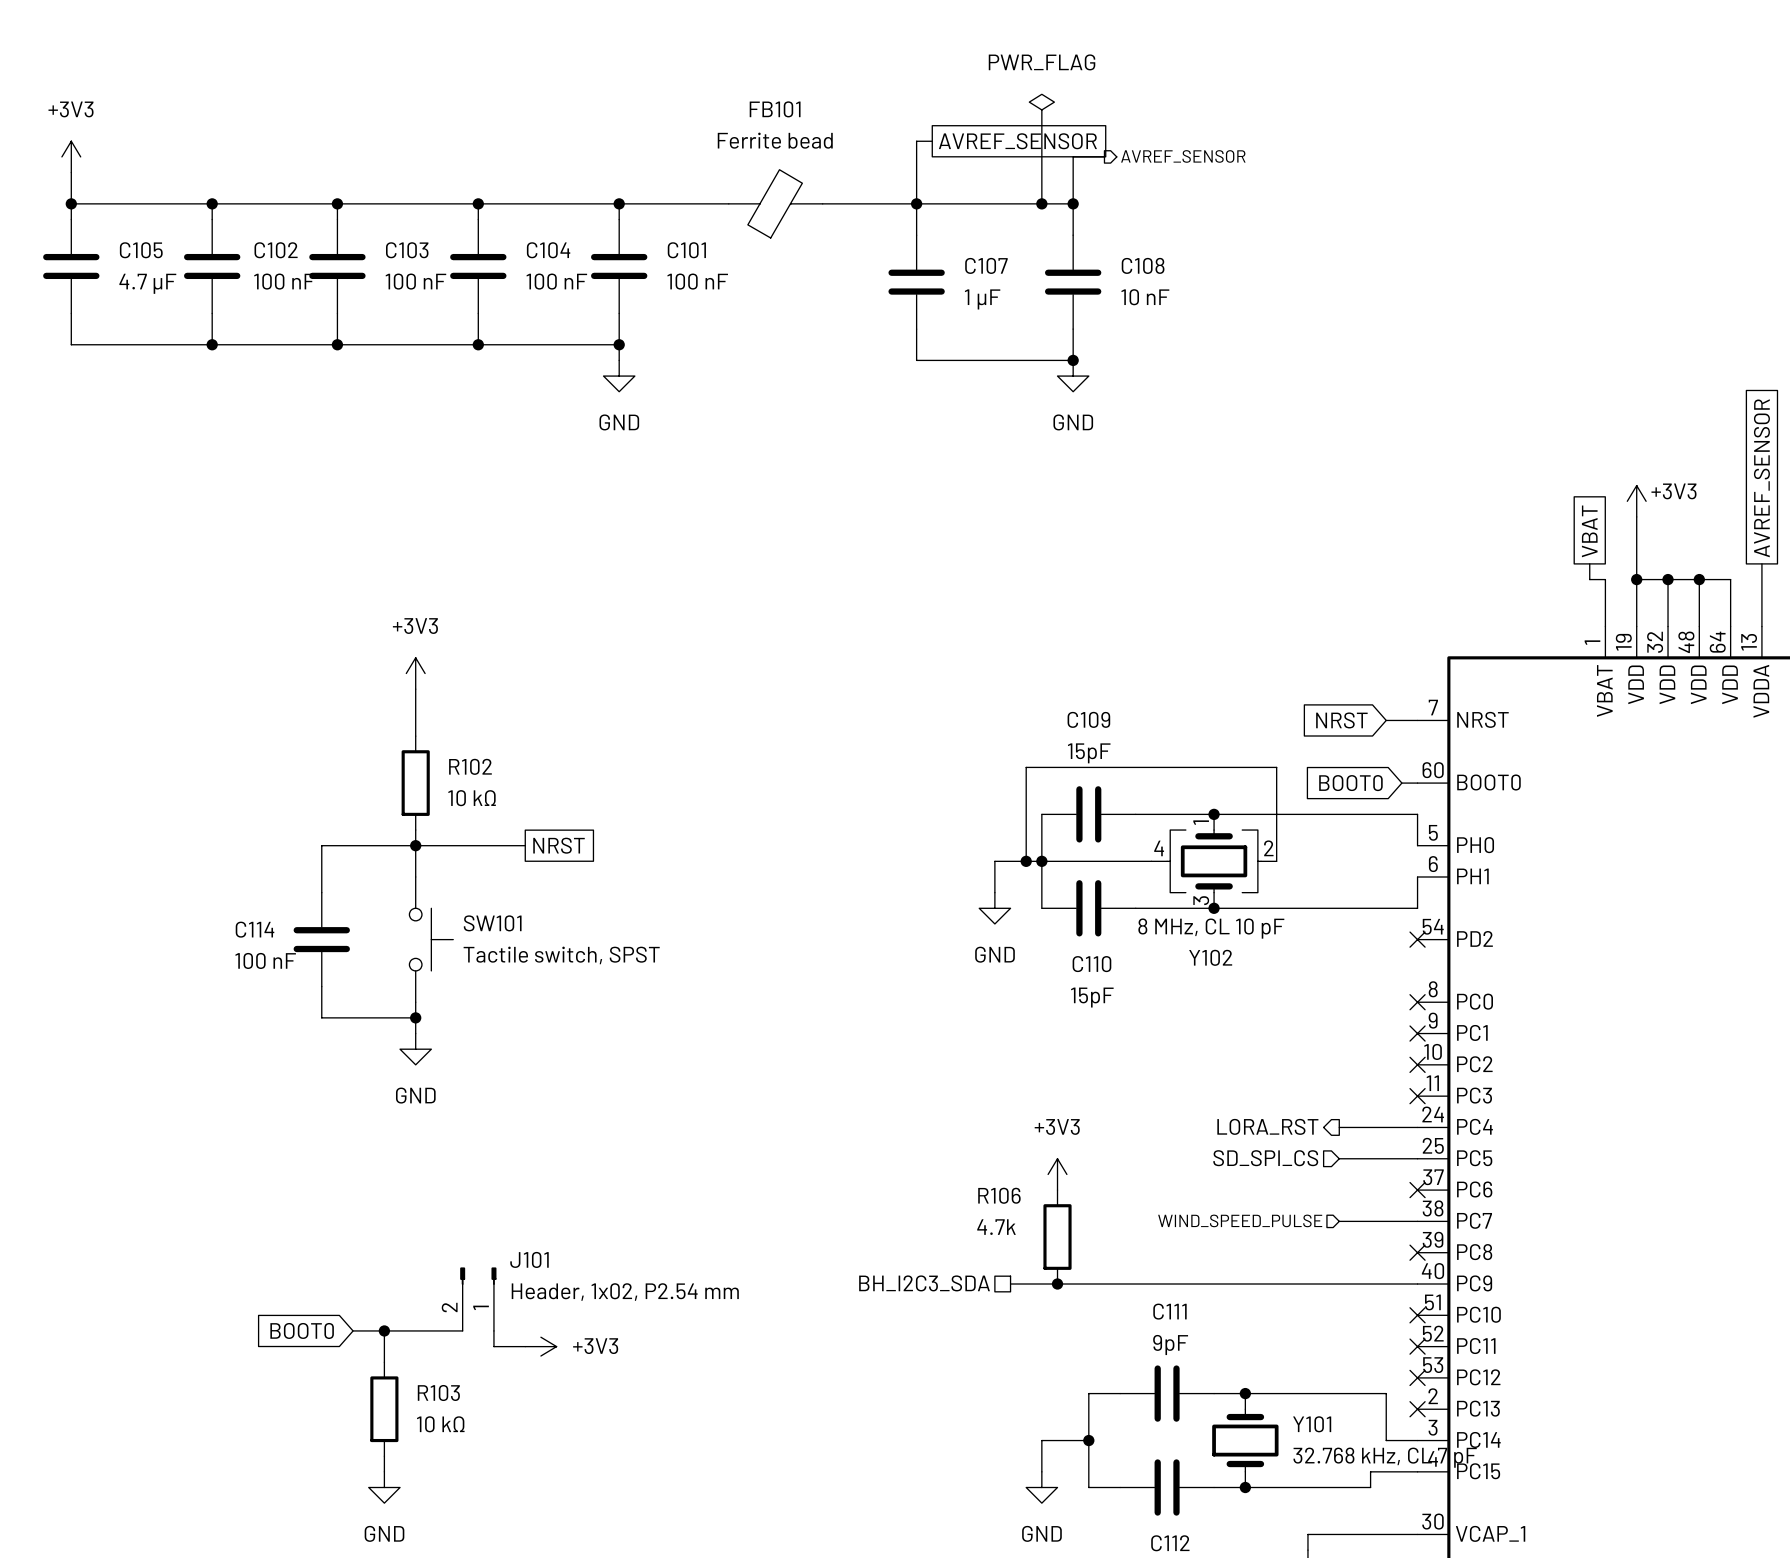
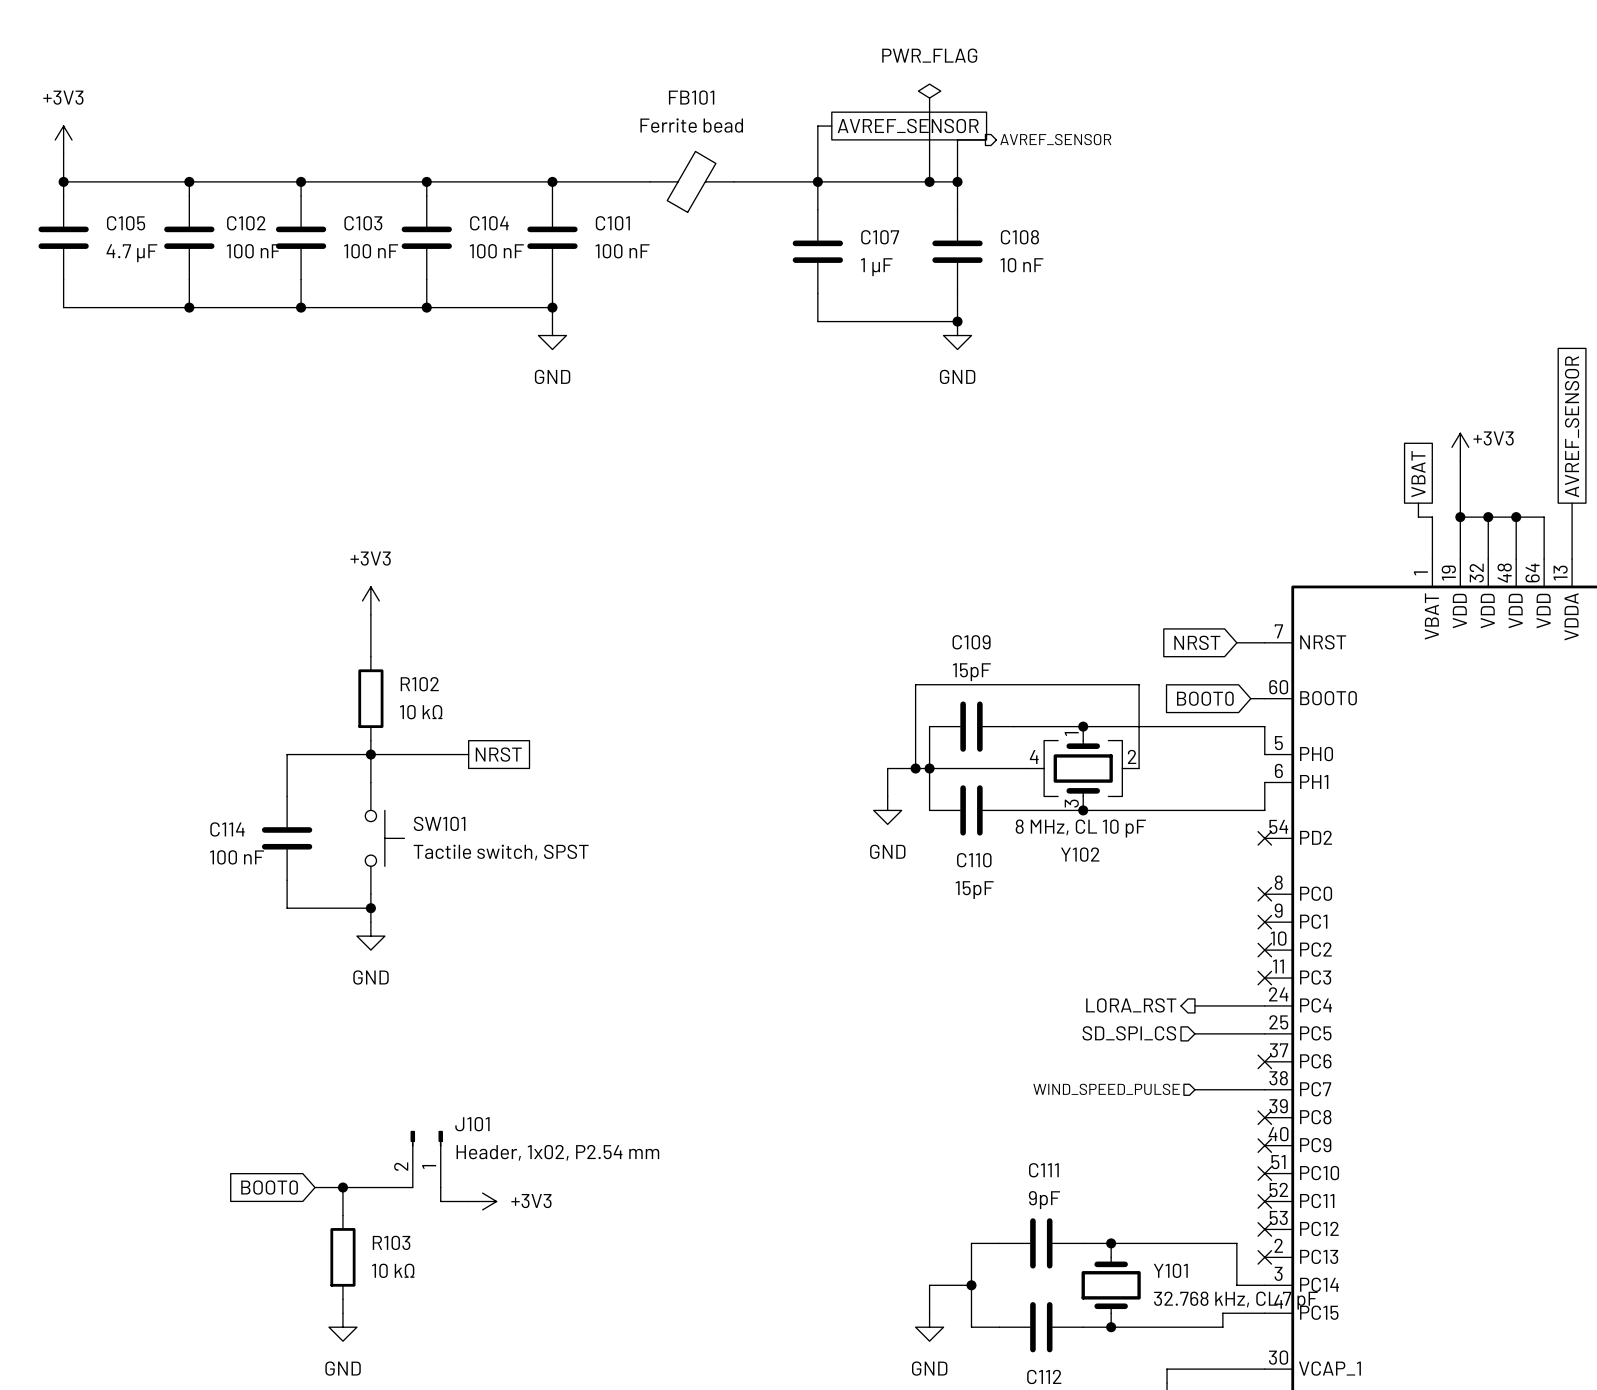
power symbol: +3V3 (1057, 1174) -> none
R106: 4.7k (1057, 1237) -> none
hierarchical label: BH_I2C3_SDA (924, 1283) -> none
wire: (1010, 1284) (1417, 1284) -> none
junction: (1057, 1284) -> none
no-connect mark: none -> (1264, 1145)

